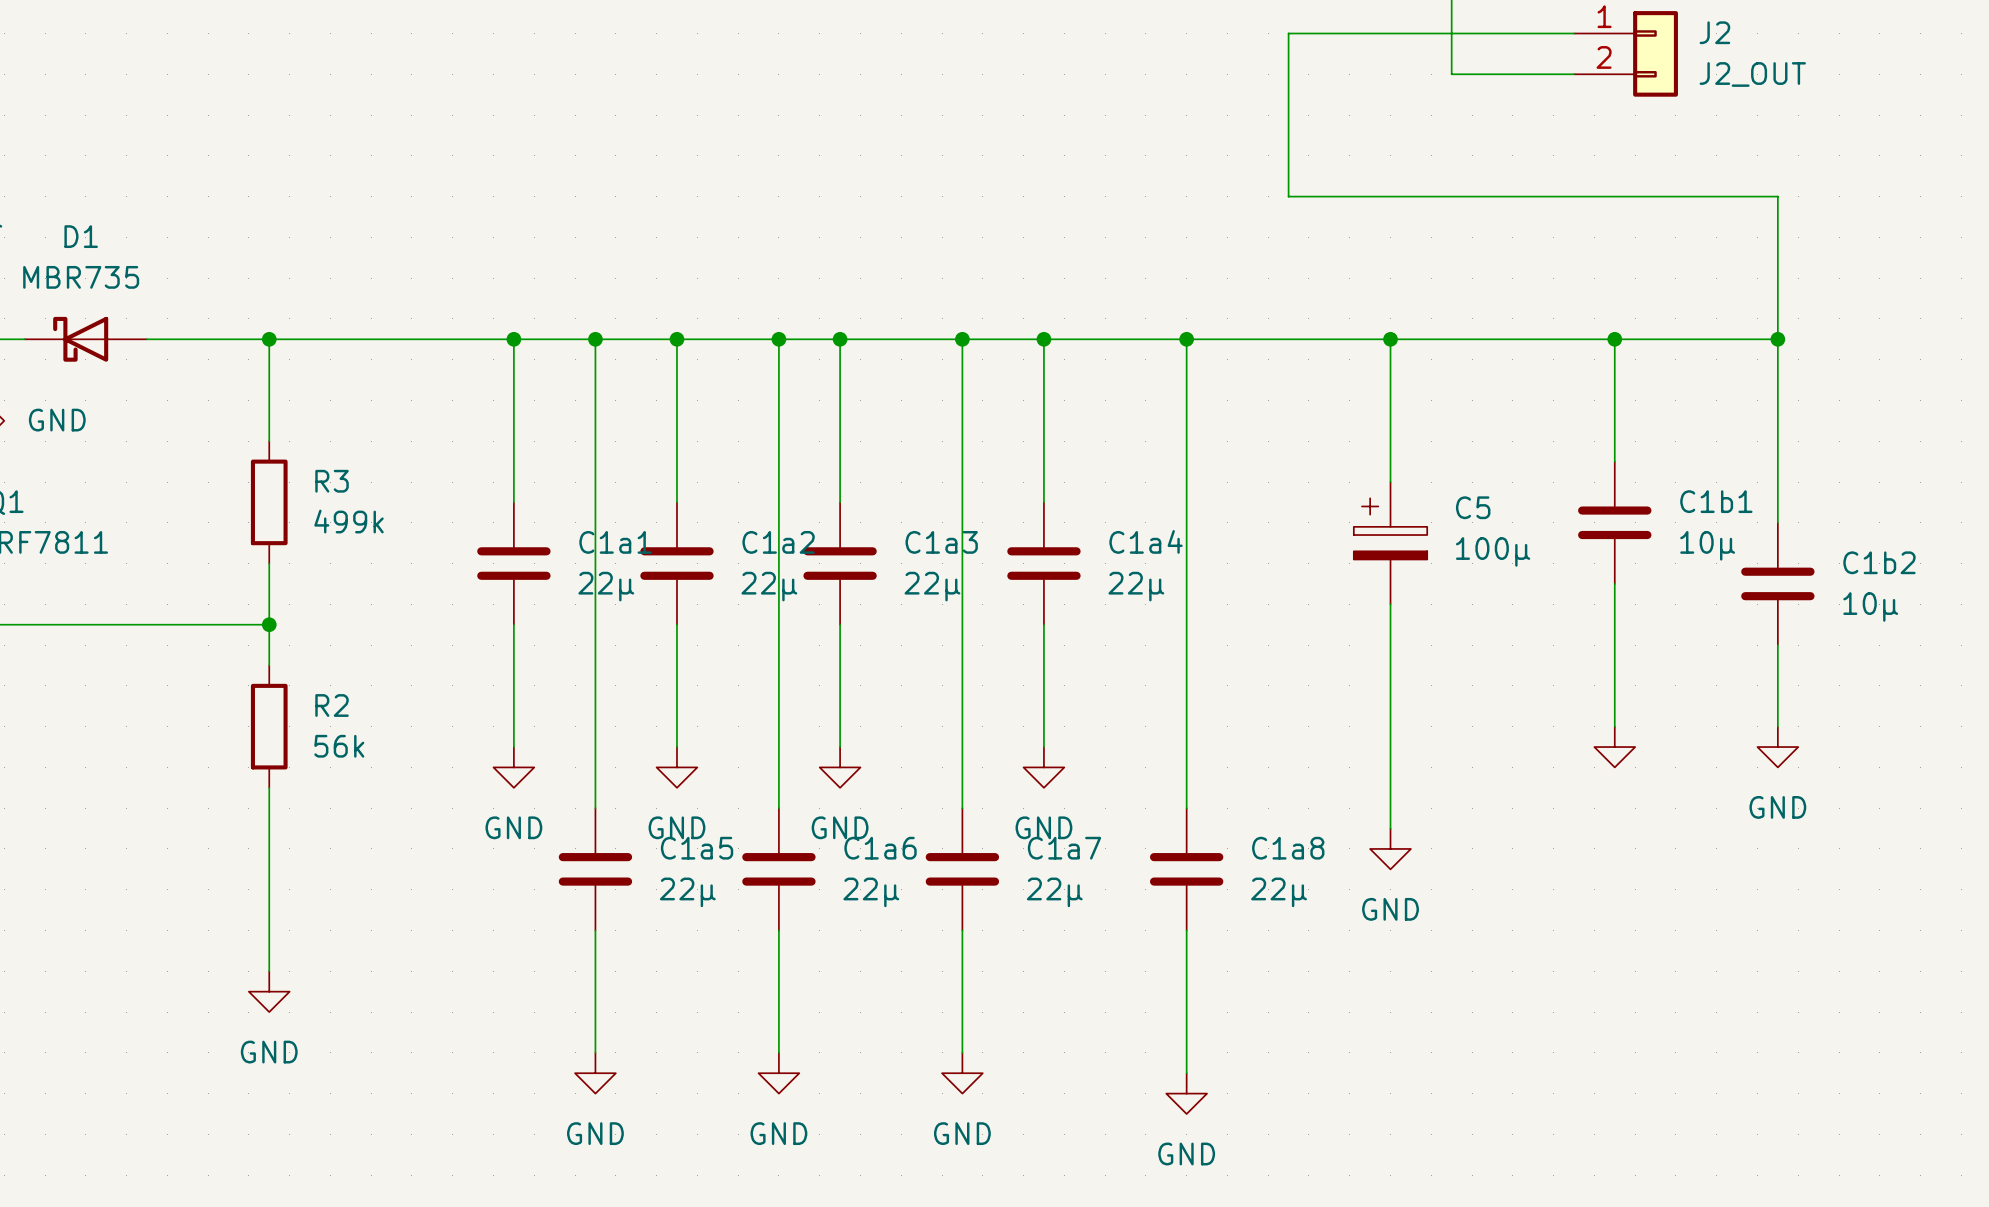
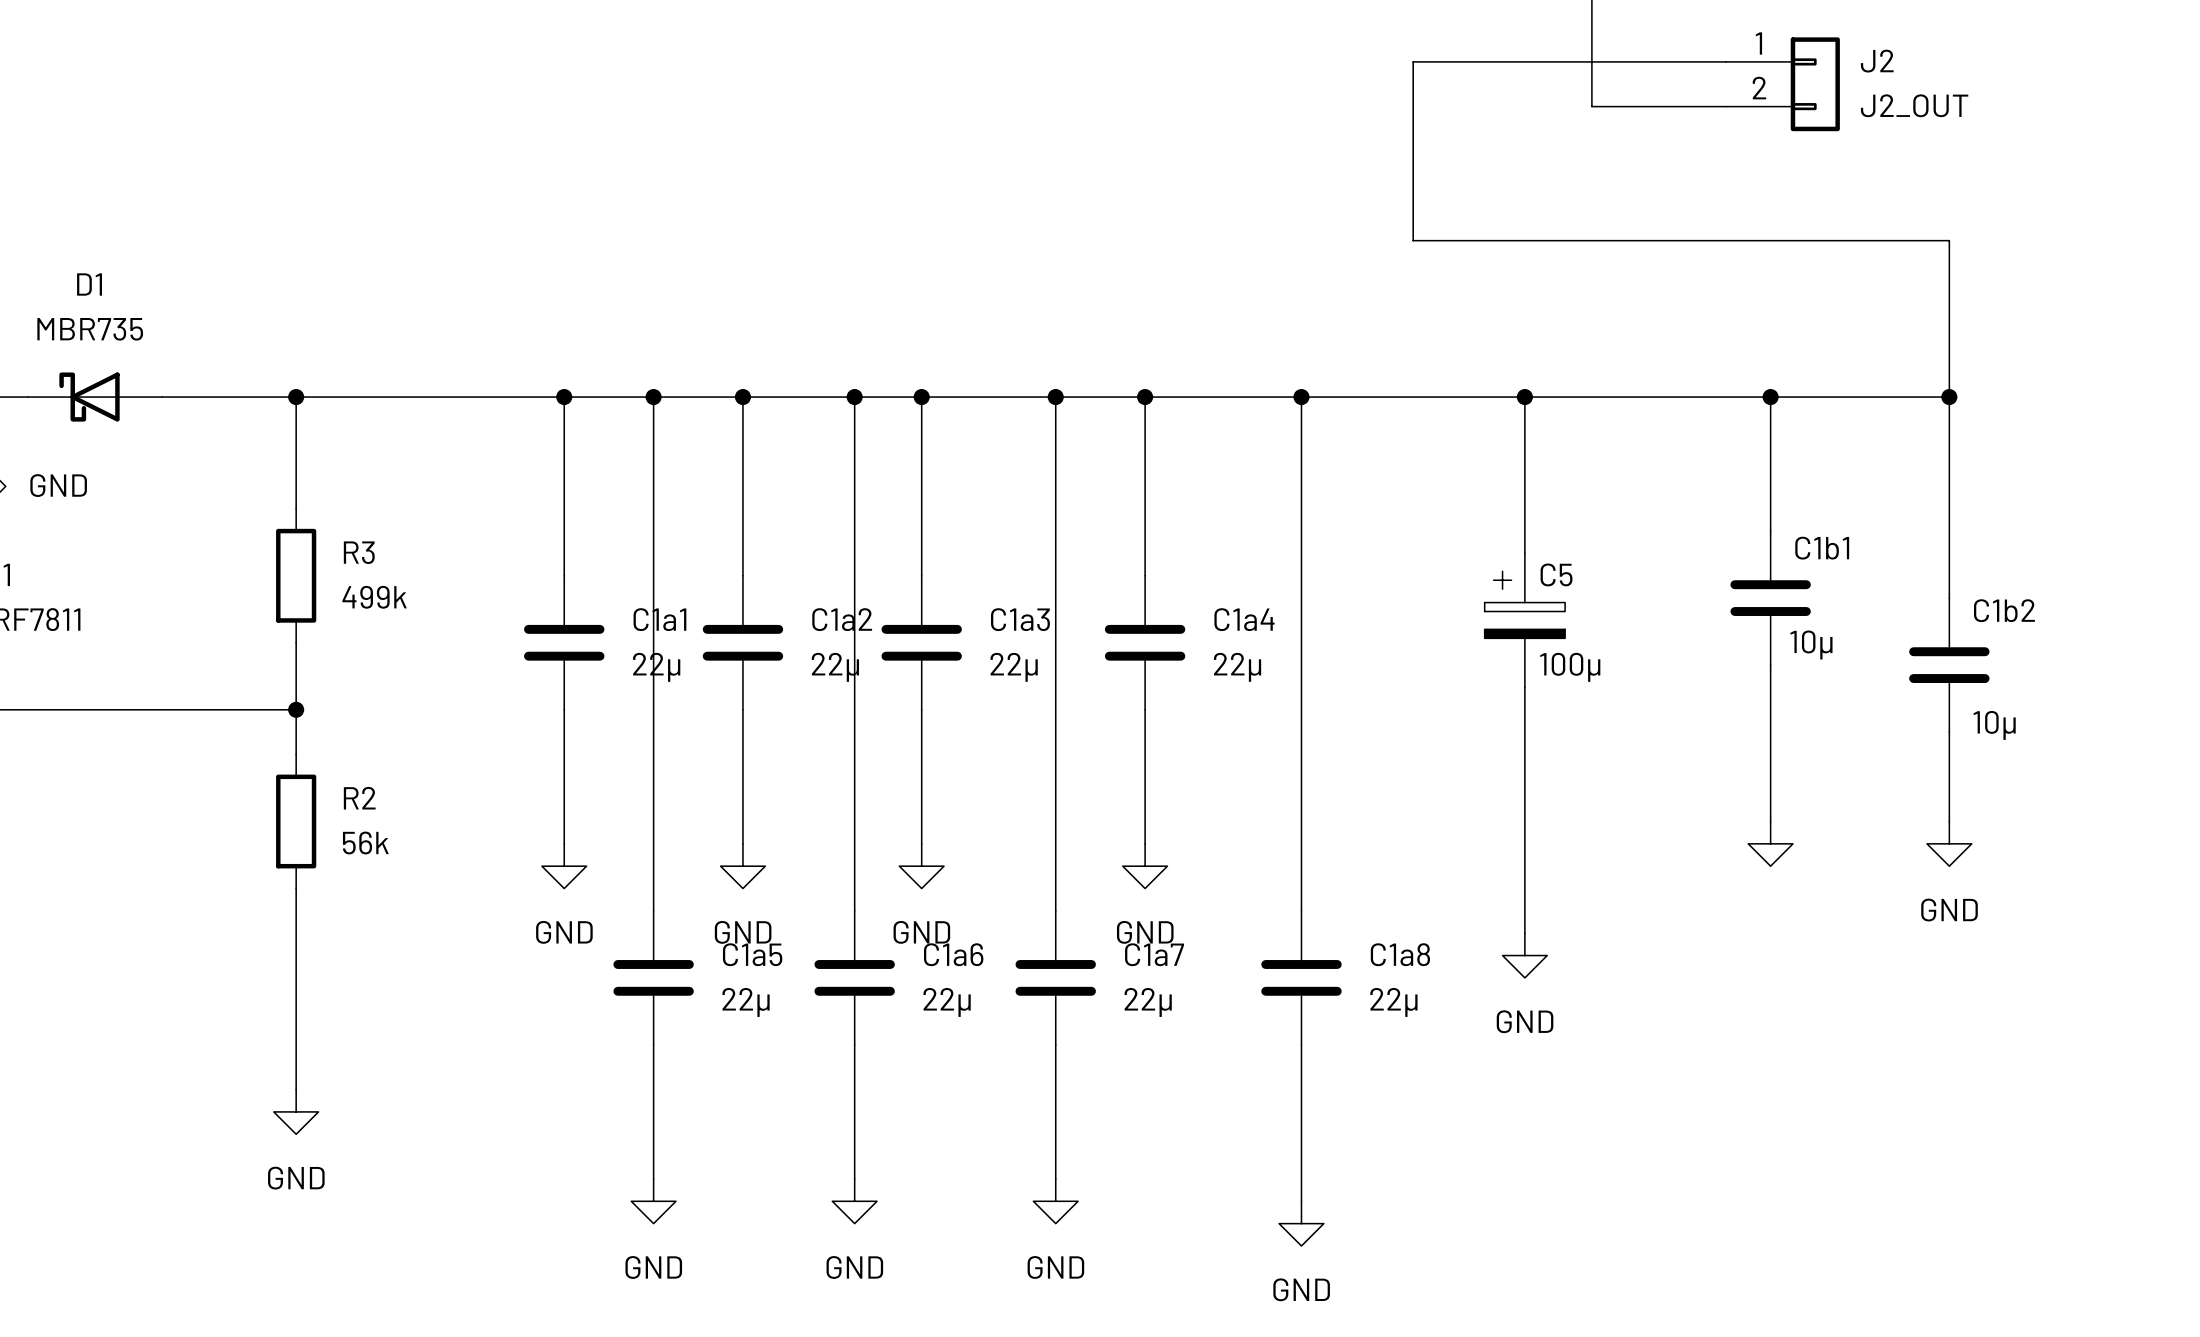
C1b1 name position: C1b1 (1716, 501) -> C1b1 (1822, 548)
C5 name position: C5 (1473, 507) -> C5 (1556, 574)
C1b1 value position: 10µ (1707, 545) -> 10µ (1811, 644)
C5 value position: 100µ (1493, 551) -> 100µ (1570, 667)
C1b2 name position: C1b2 (1879, 562) -> C1b2 (2004, 610)
C1b2 value position: 10µ (1870, 606) -> 10µ (1994, 725)

